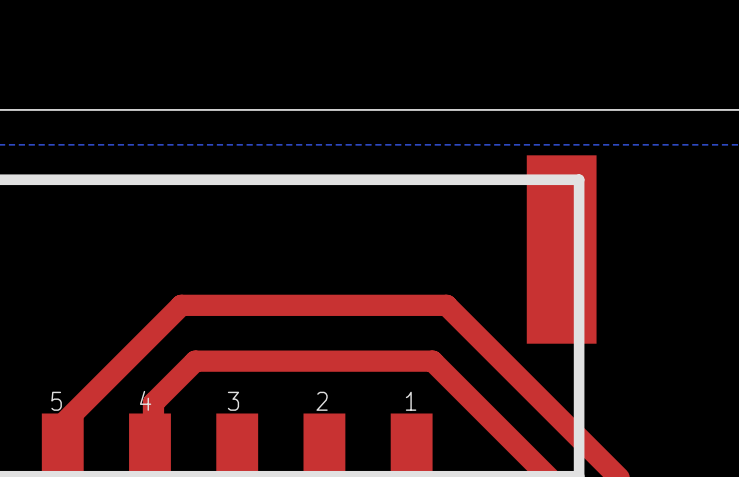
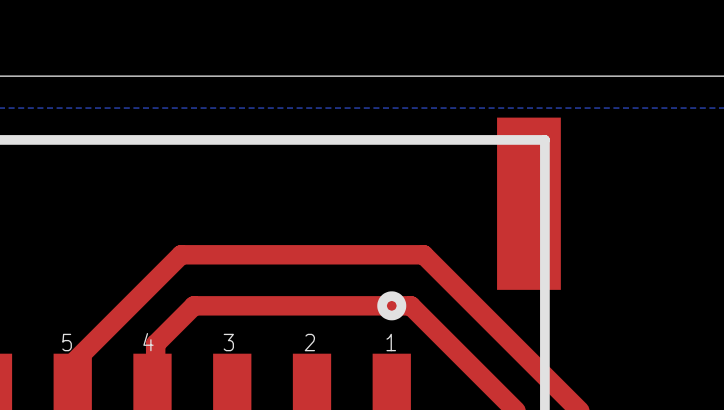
drawing: none -> [377, 291, 407, 321]

